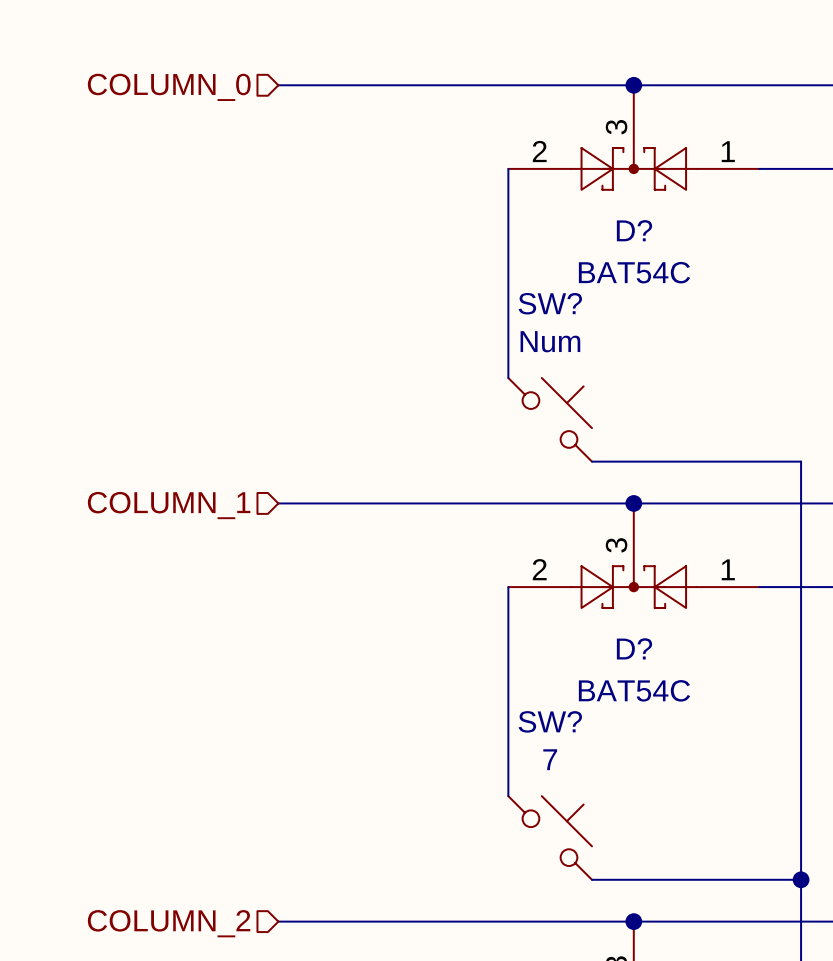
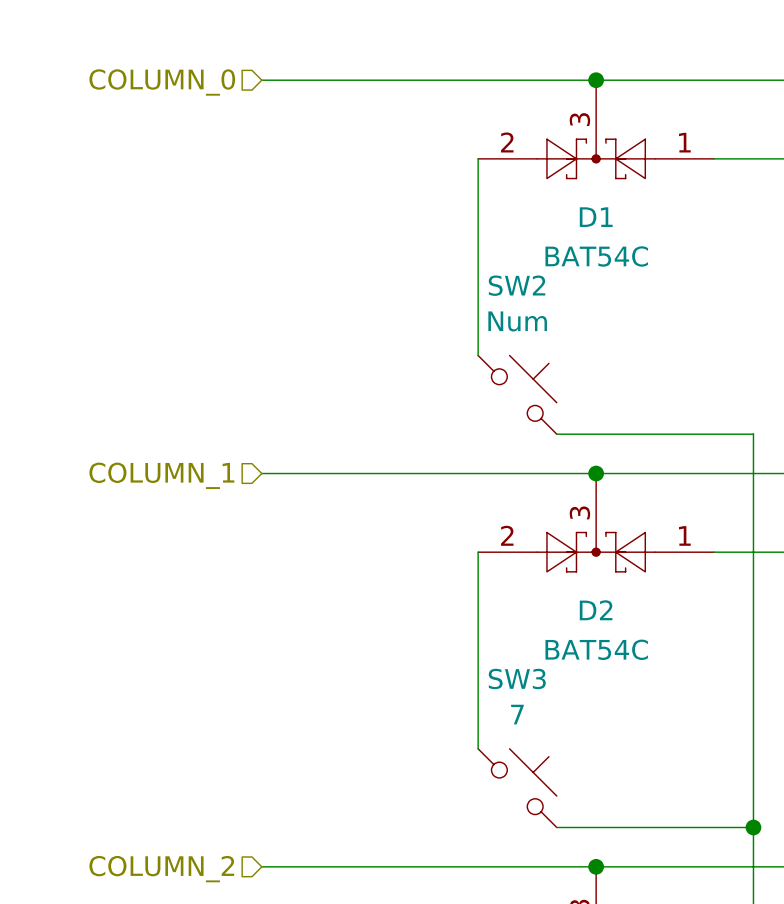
D? name: D? (634, 230) -> D1 (596, 217)
SW? name: SW? (550, 303) -> SW2 (517, 285)
D? name: D? (634, 648) -> D2 (596, 610)
SW? name: SW? (550, 721) -> SW3 (517, 678)

